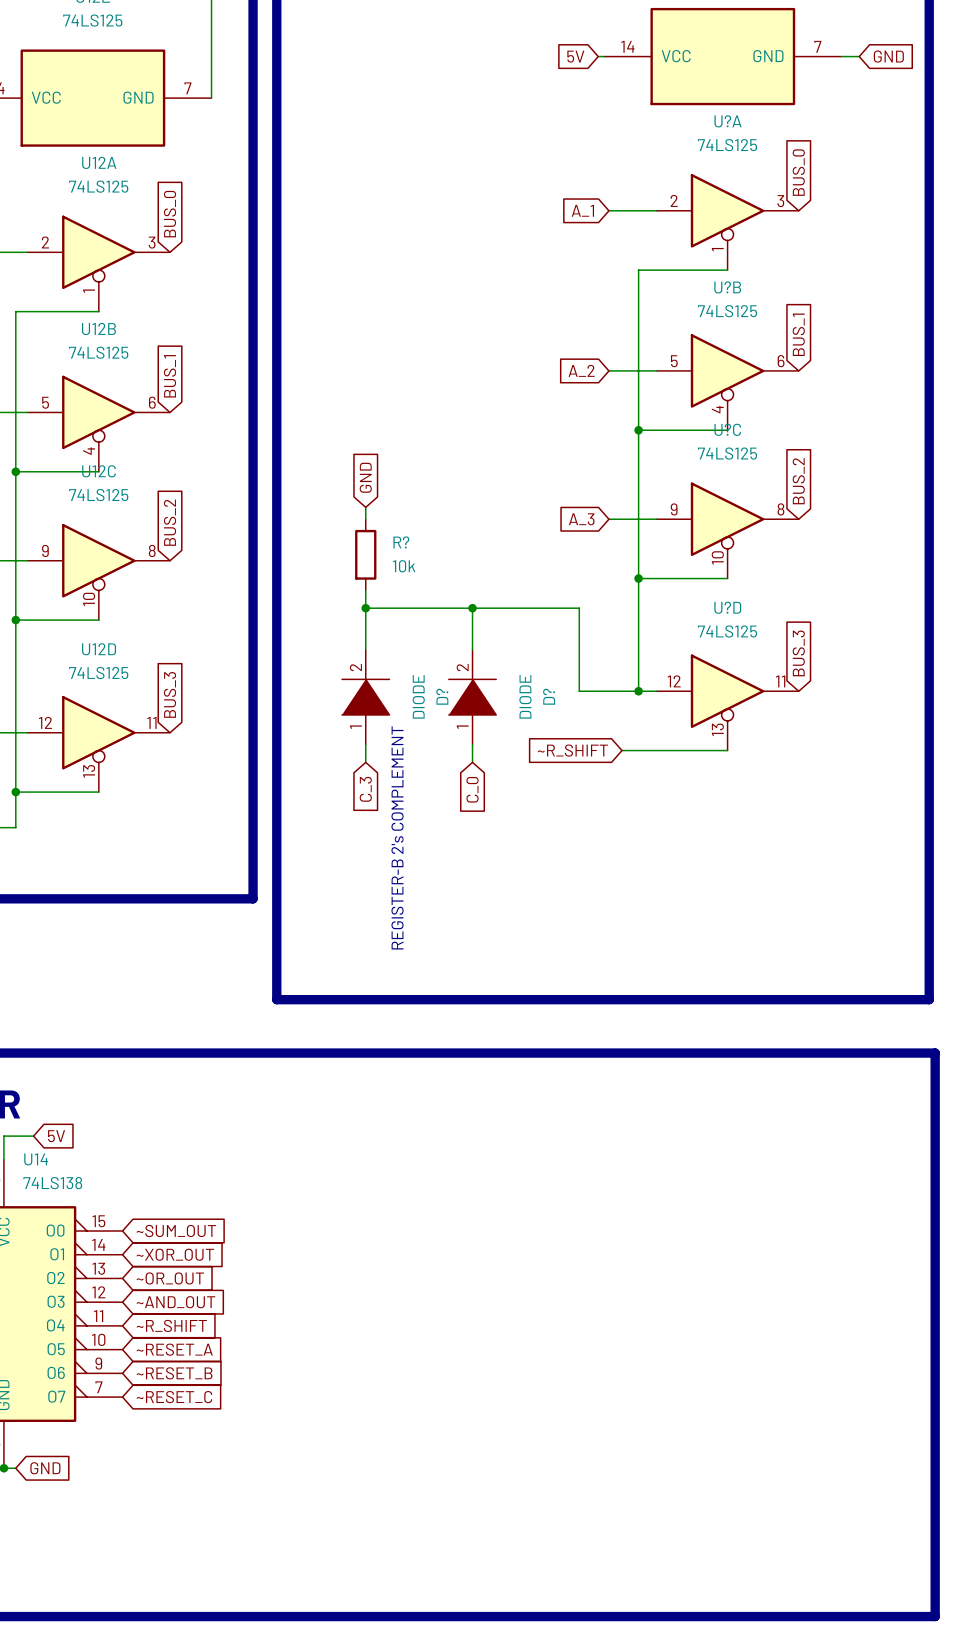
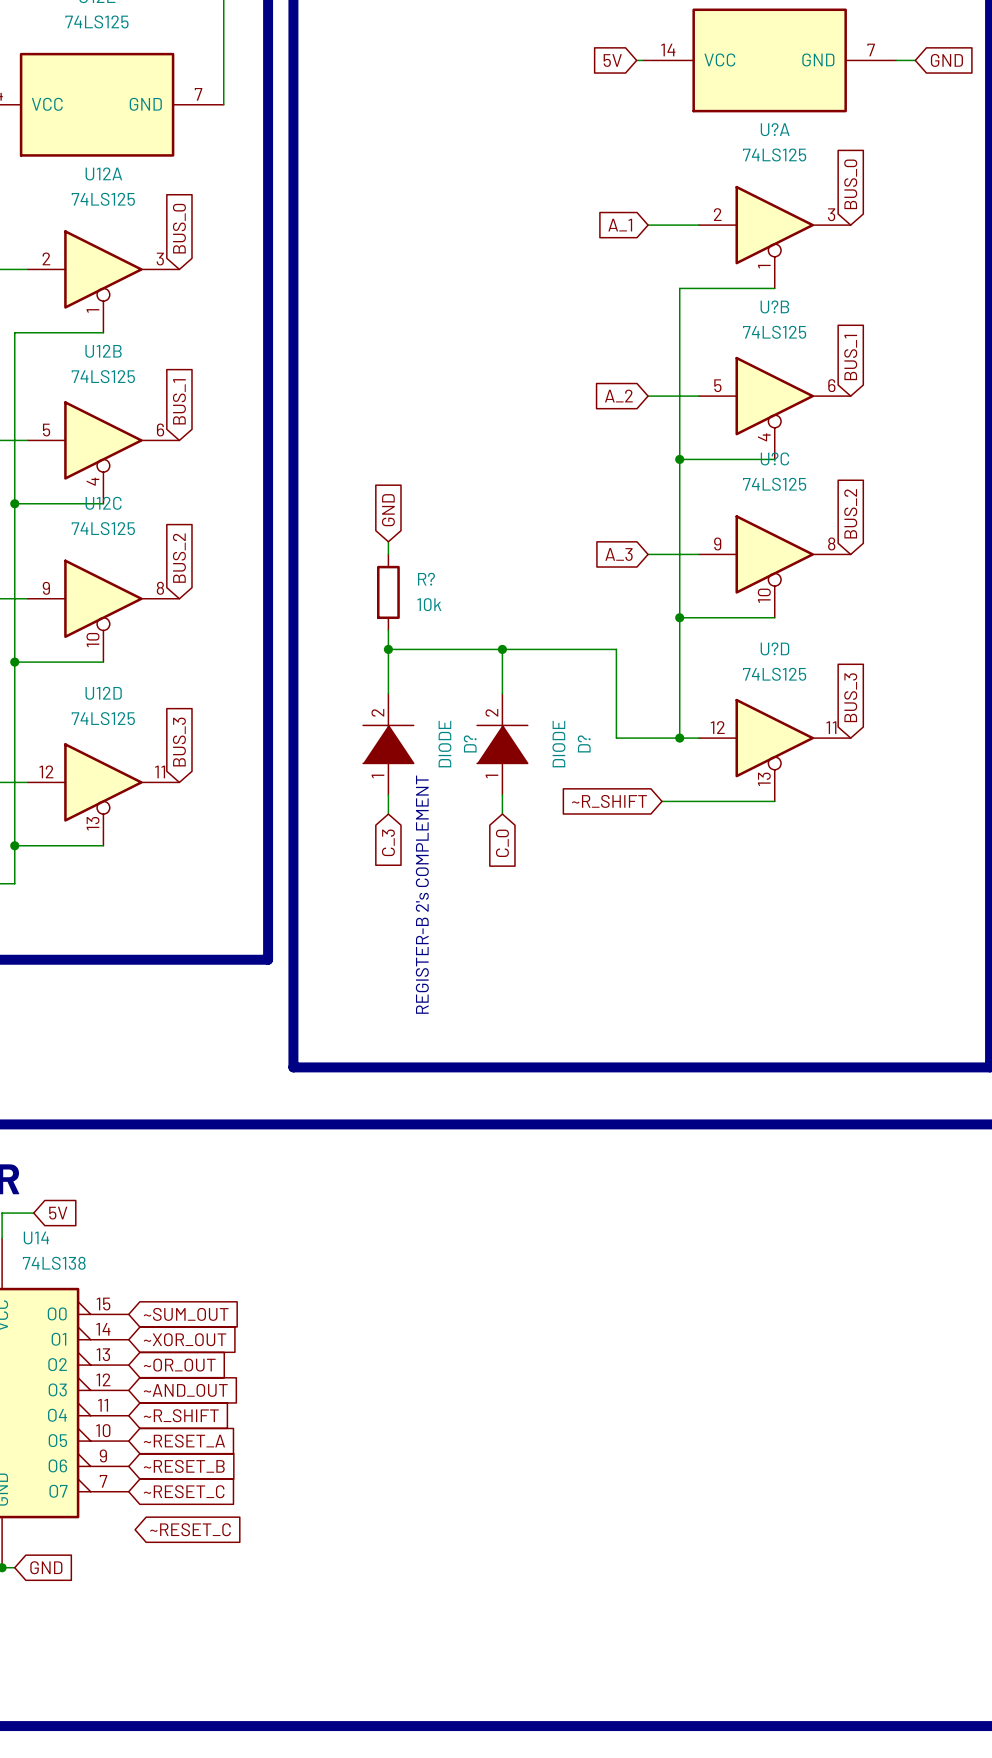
global label: none -> ~RESET_C (190, 1529)

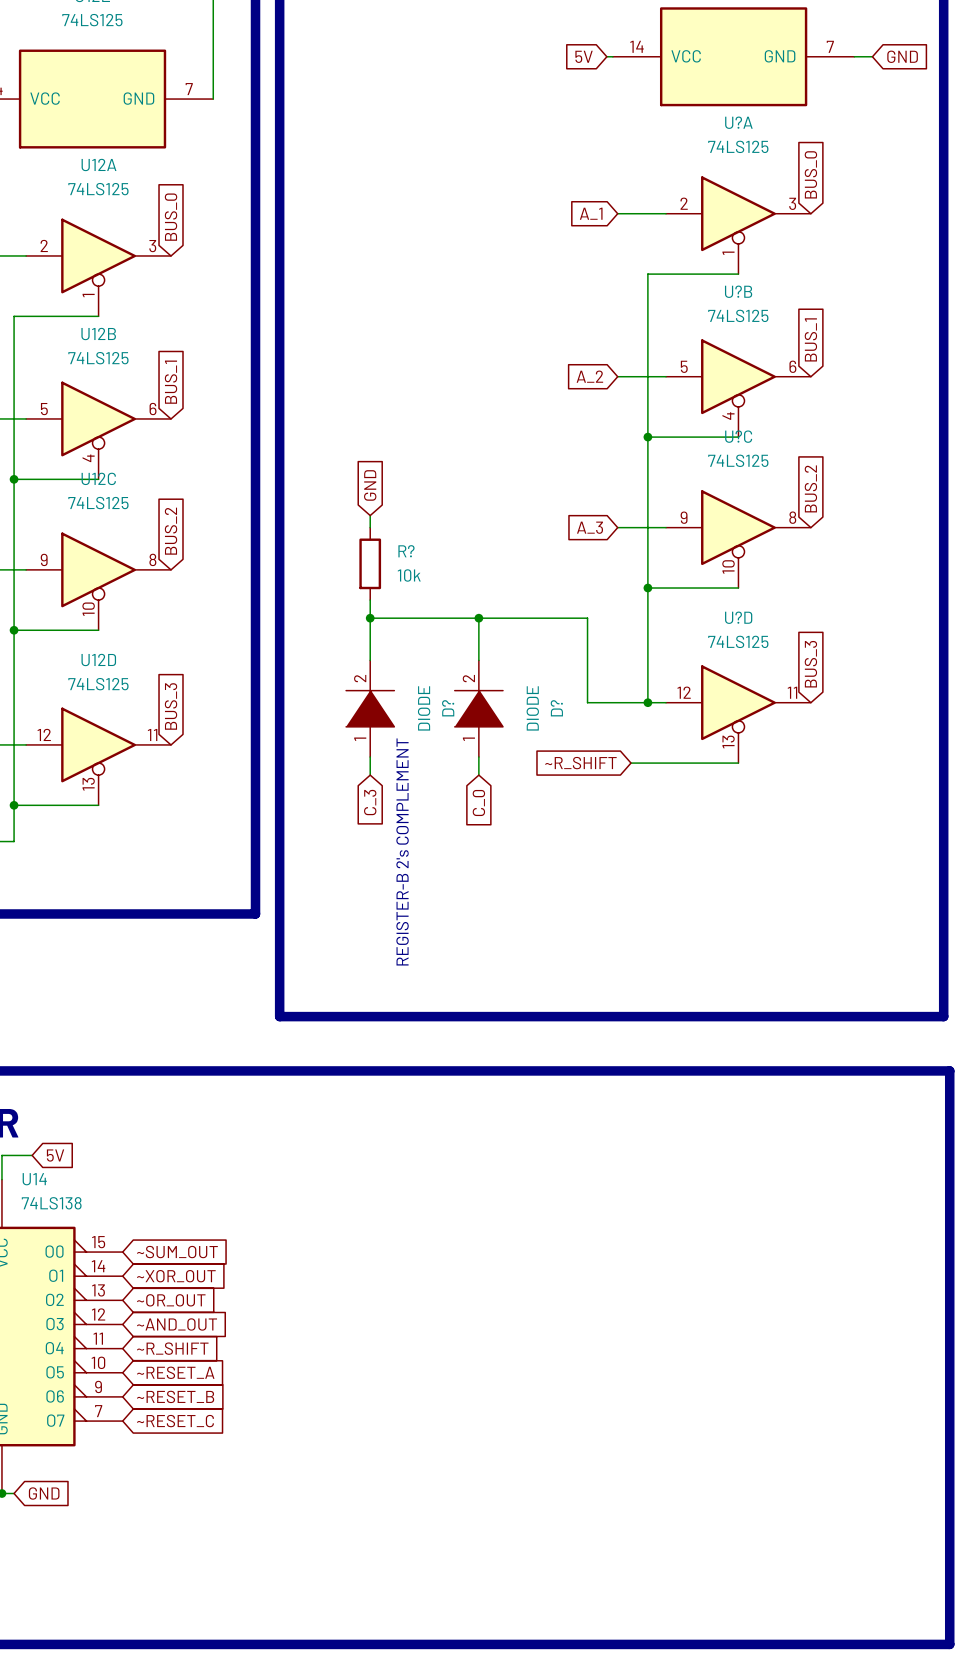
global label: ~RESET_C (190, 1529) -> none

